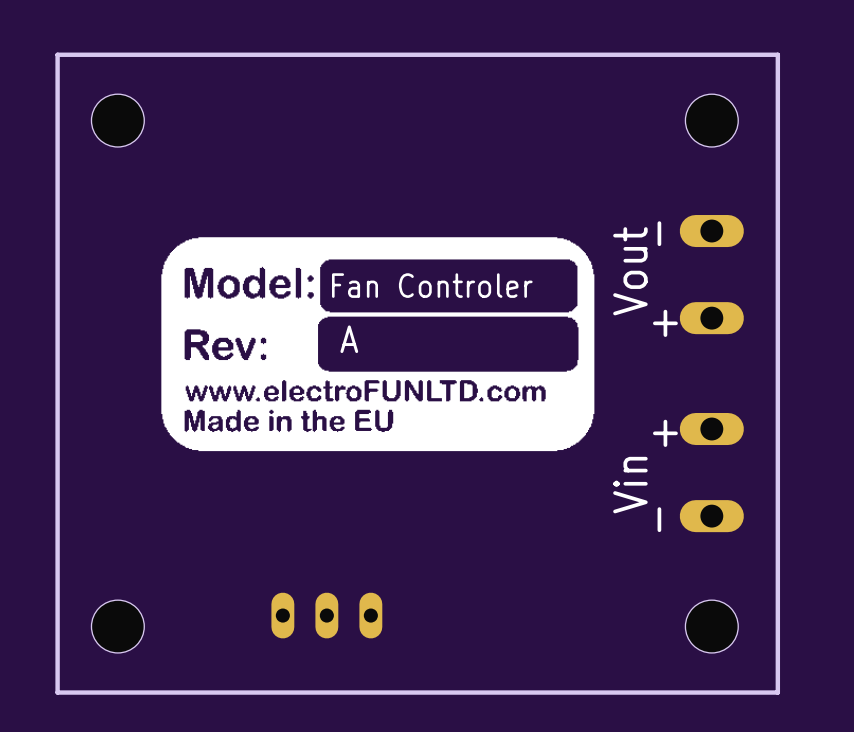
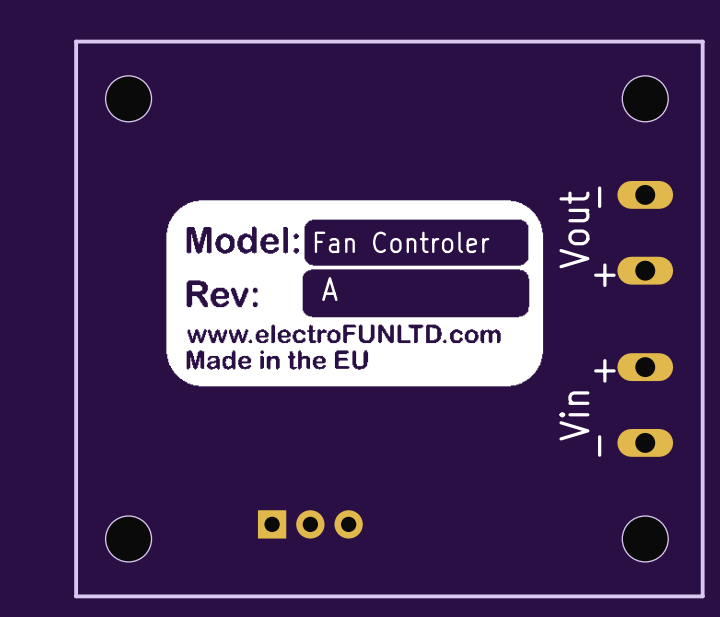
part footprint: [271, 592, 383, 639] -> [257, 510, 363, 539]

